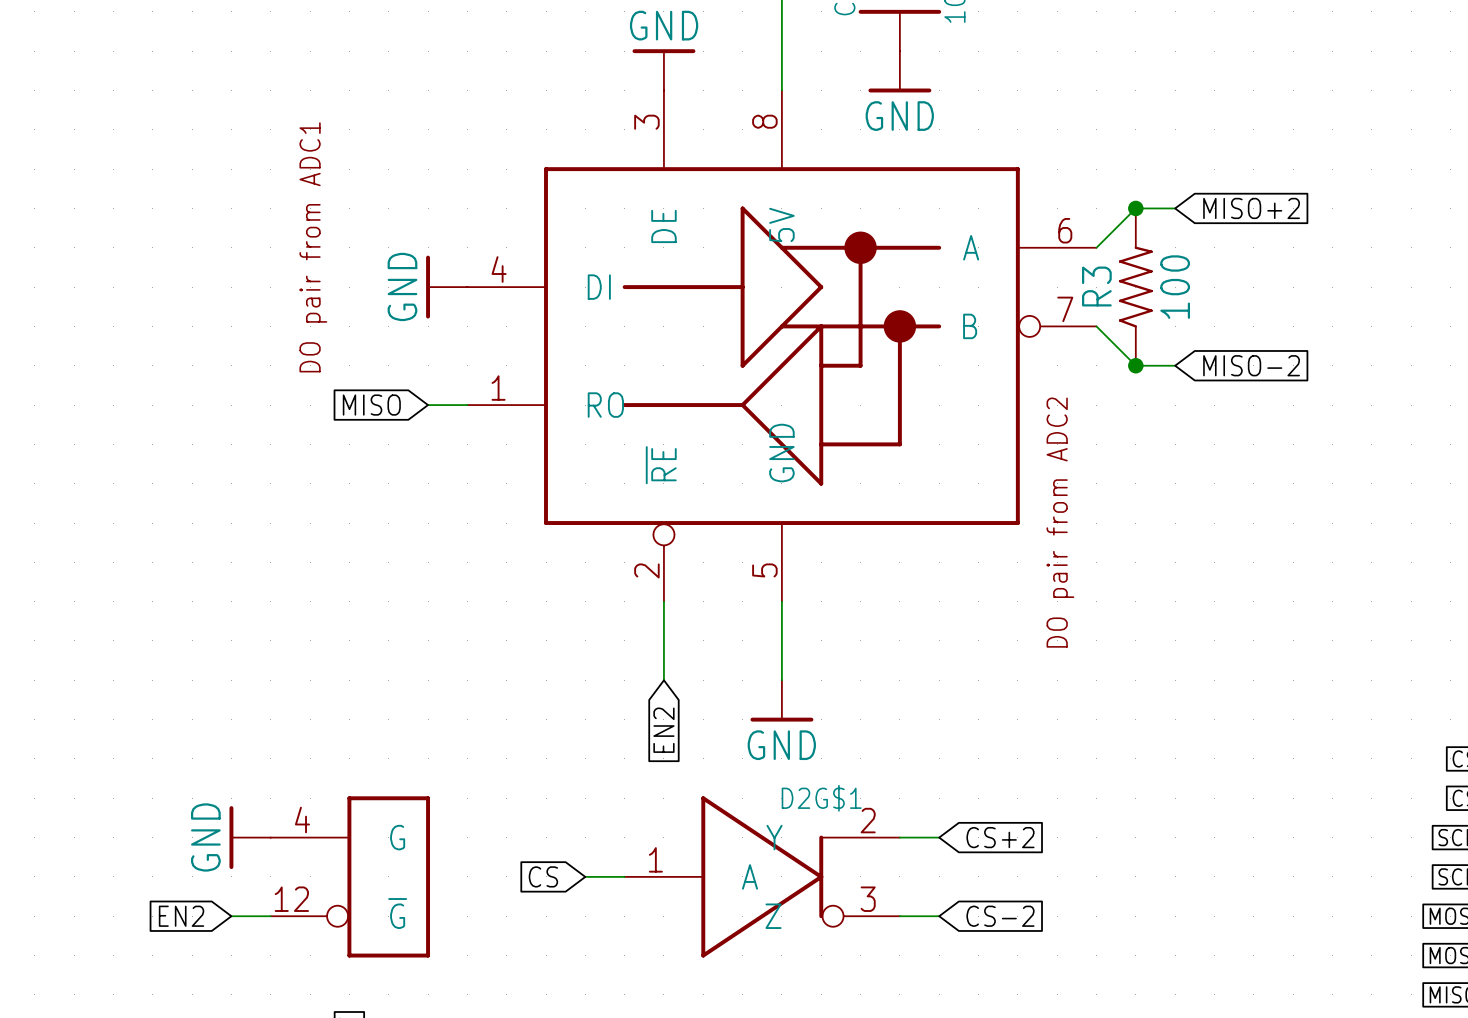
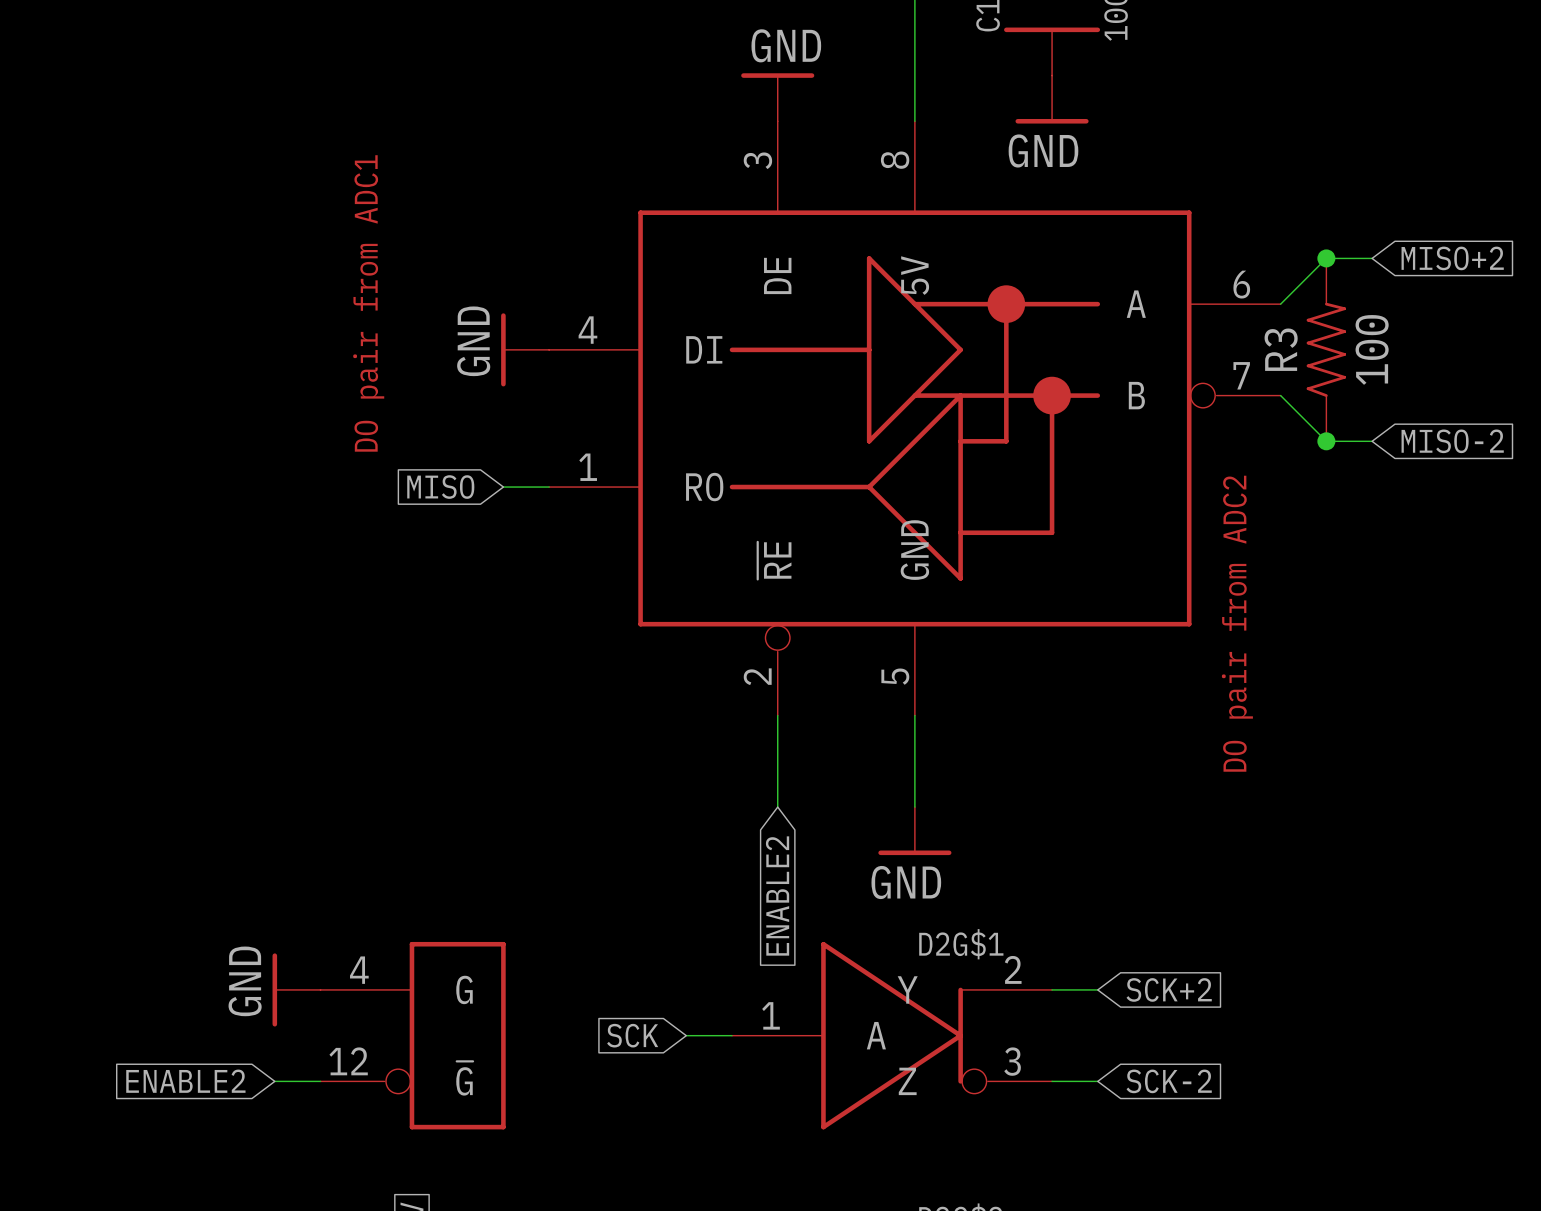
global label: EN2 (663, 730) -> ENABLE2 (777, 896)
global label: CS+2 (1000, 837) -> SCK+2 (1169, 989)
global label: CS (543, 876) -> SCK (632, 1035)
global label: EN2 (181, 916) -> ENABLE2 (185, 1081)
global label: CS-2 (1000, 916) -> SCK-2 (1169, 1081)

